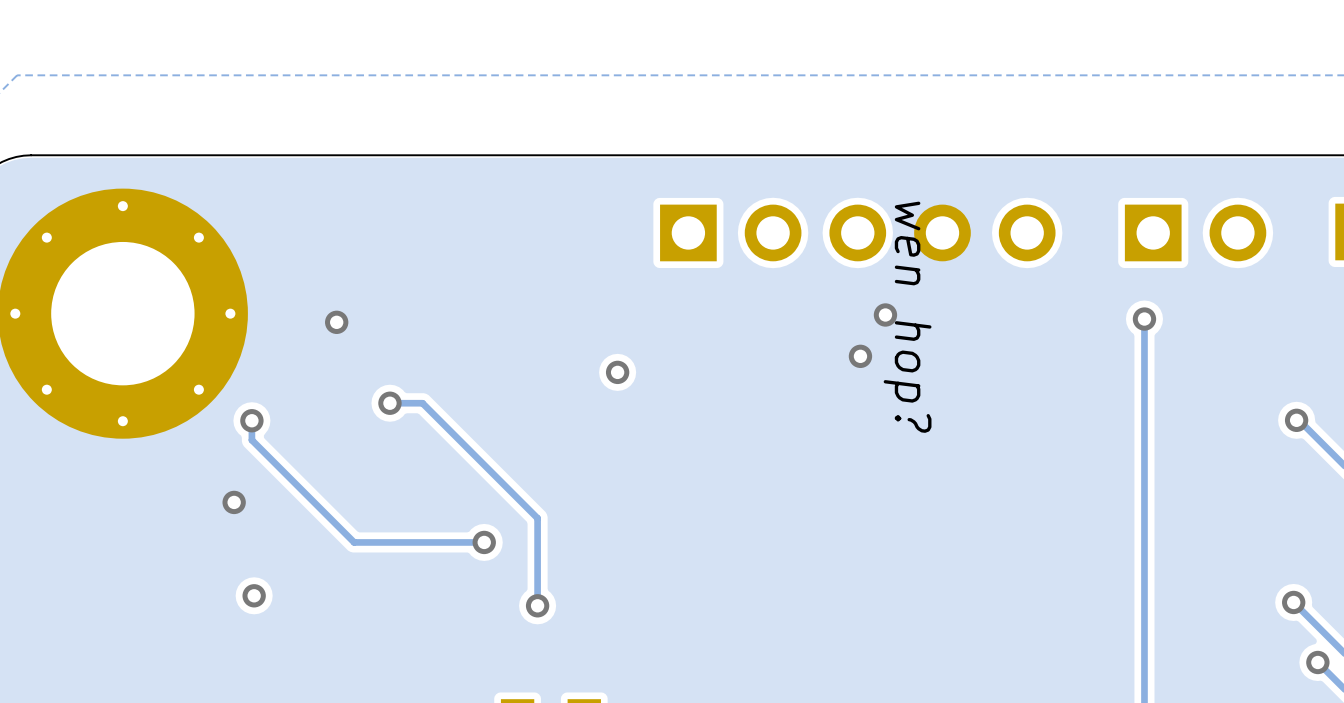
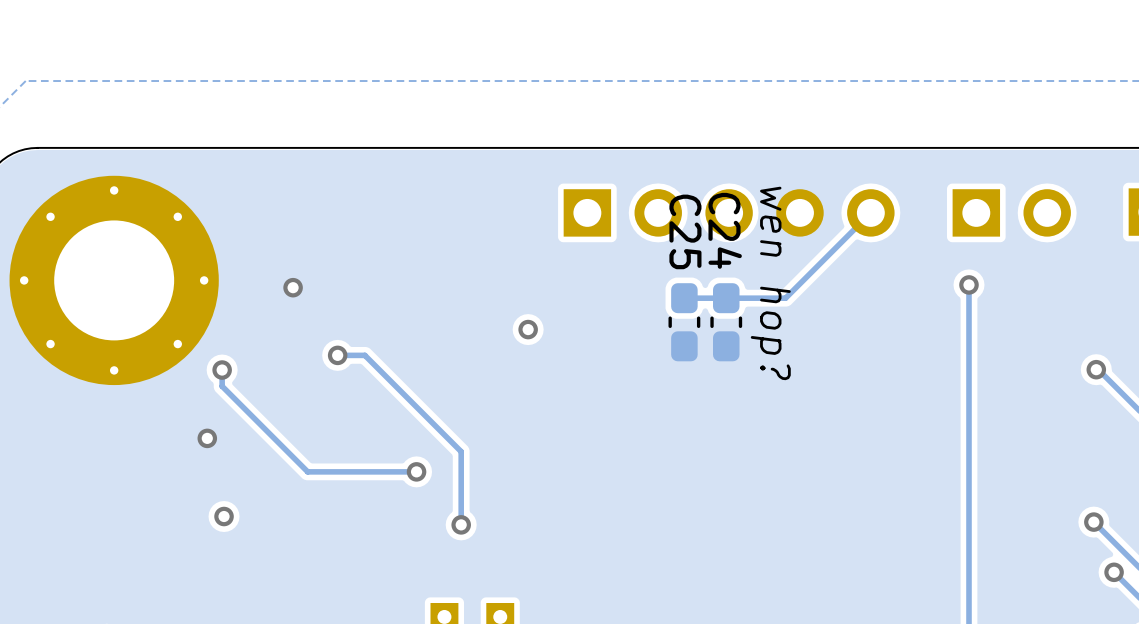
track: none -> (870, 212) (785, 298) (684, 298)
via: (885, 314) -> none
via: (860, 356) -> none
C25: none -> (684, 322)
C24: none -> (726, 322)

